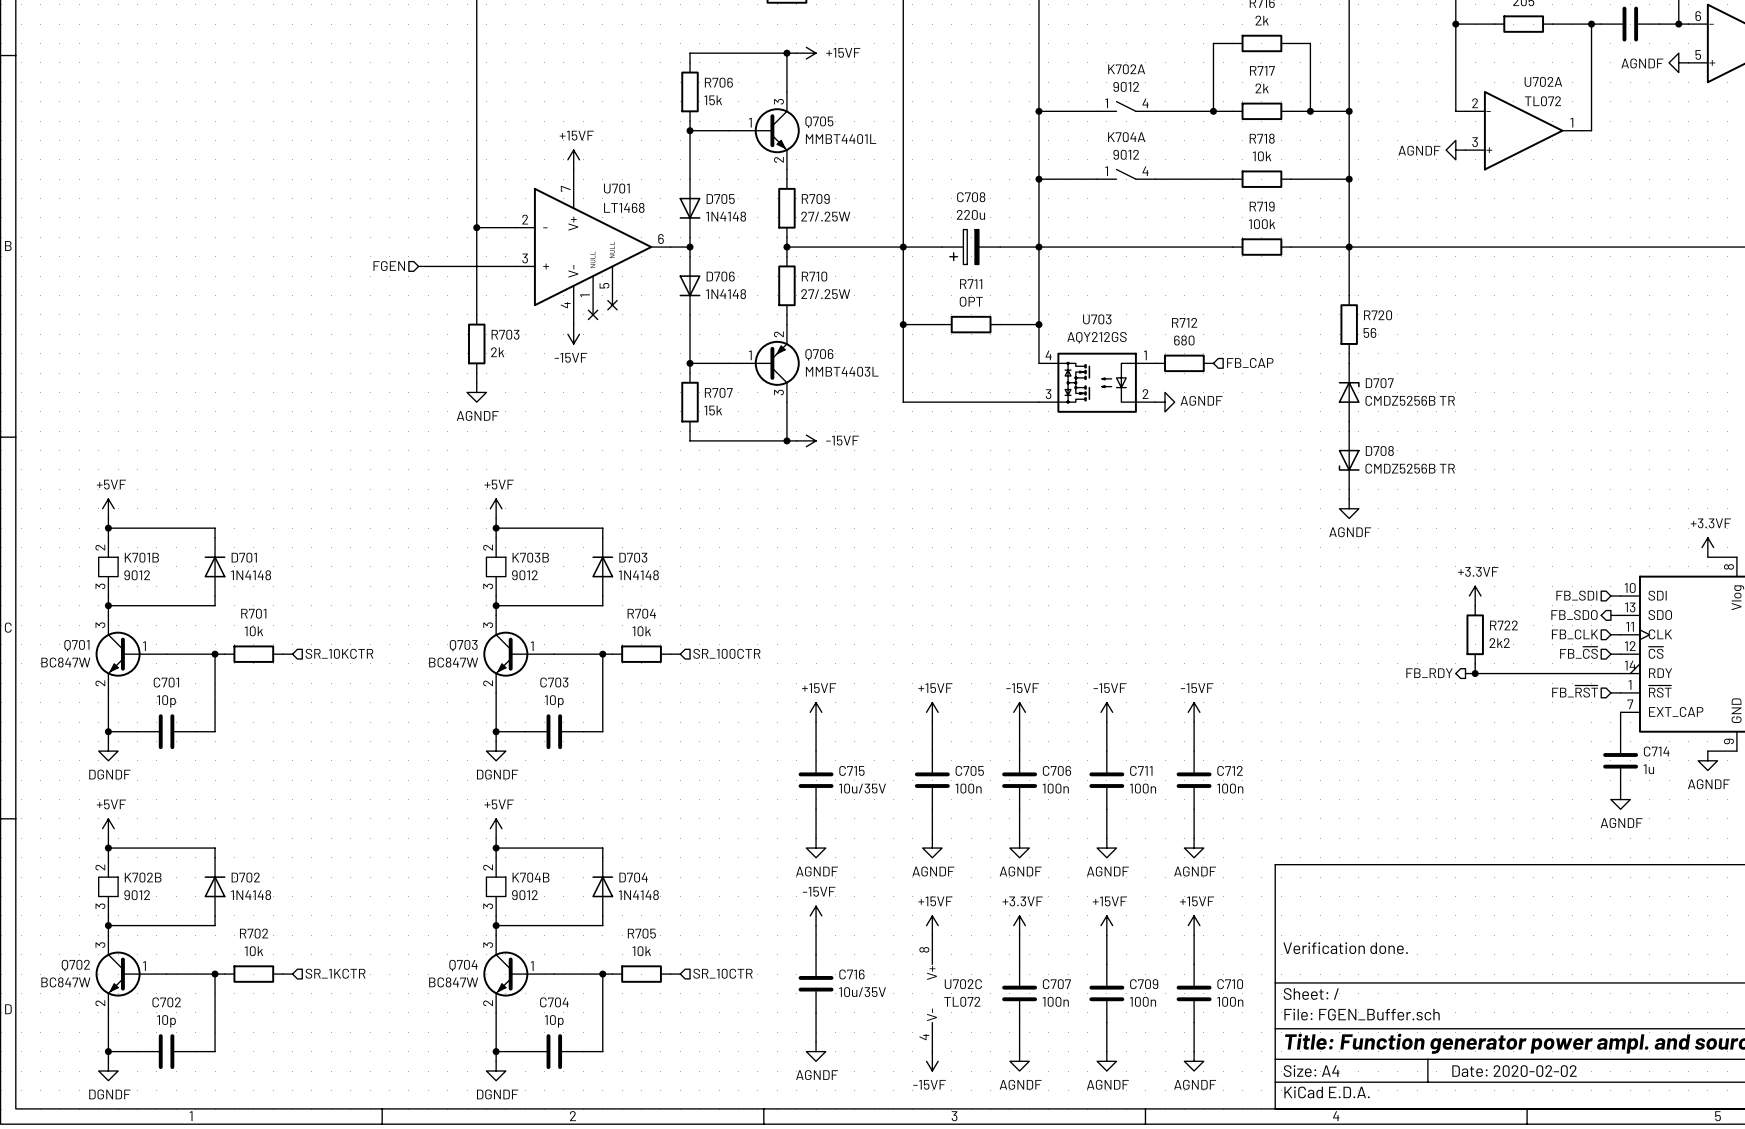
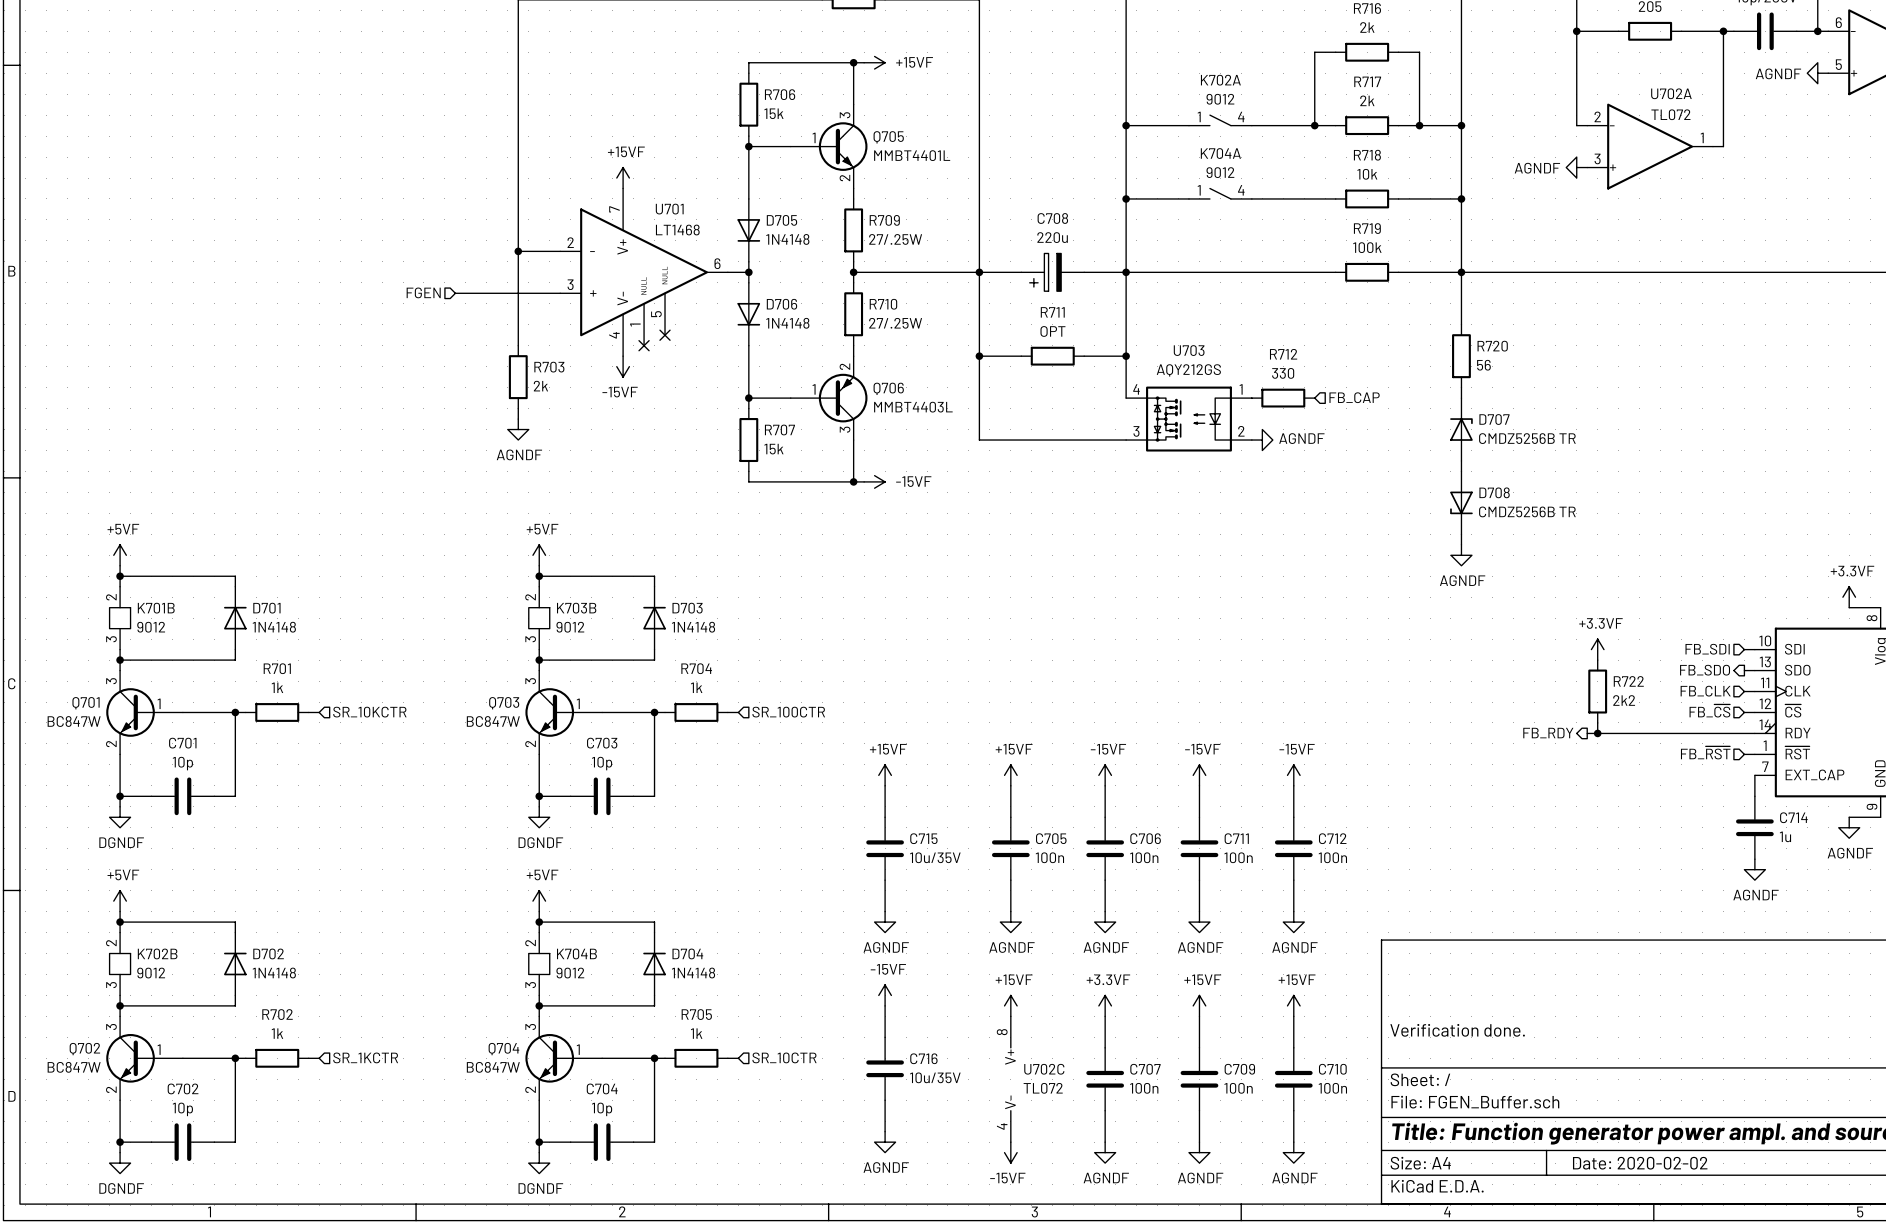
R712 value: 680 (1184, 340) -> 330 (1283, 373)
R701 value: 10k (253, 631) -> 1k (277, 687)
R704 value: 10k (641, 631) -> 1k (696, 687)
R702 value: 10k (253, 951) -> 1k (277, 1033)
R705 value: 10k (641, 951) -> 1k (696, 1033)

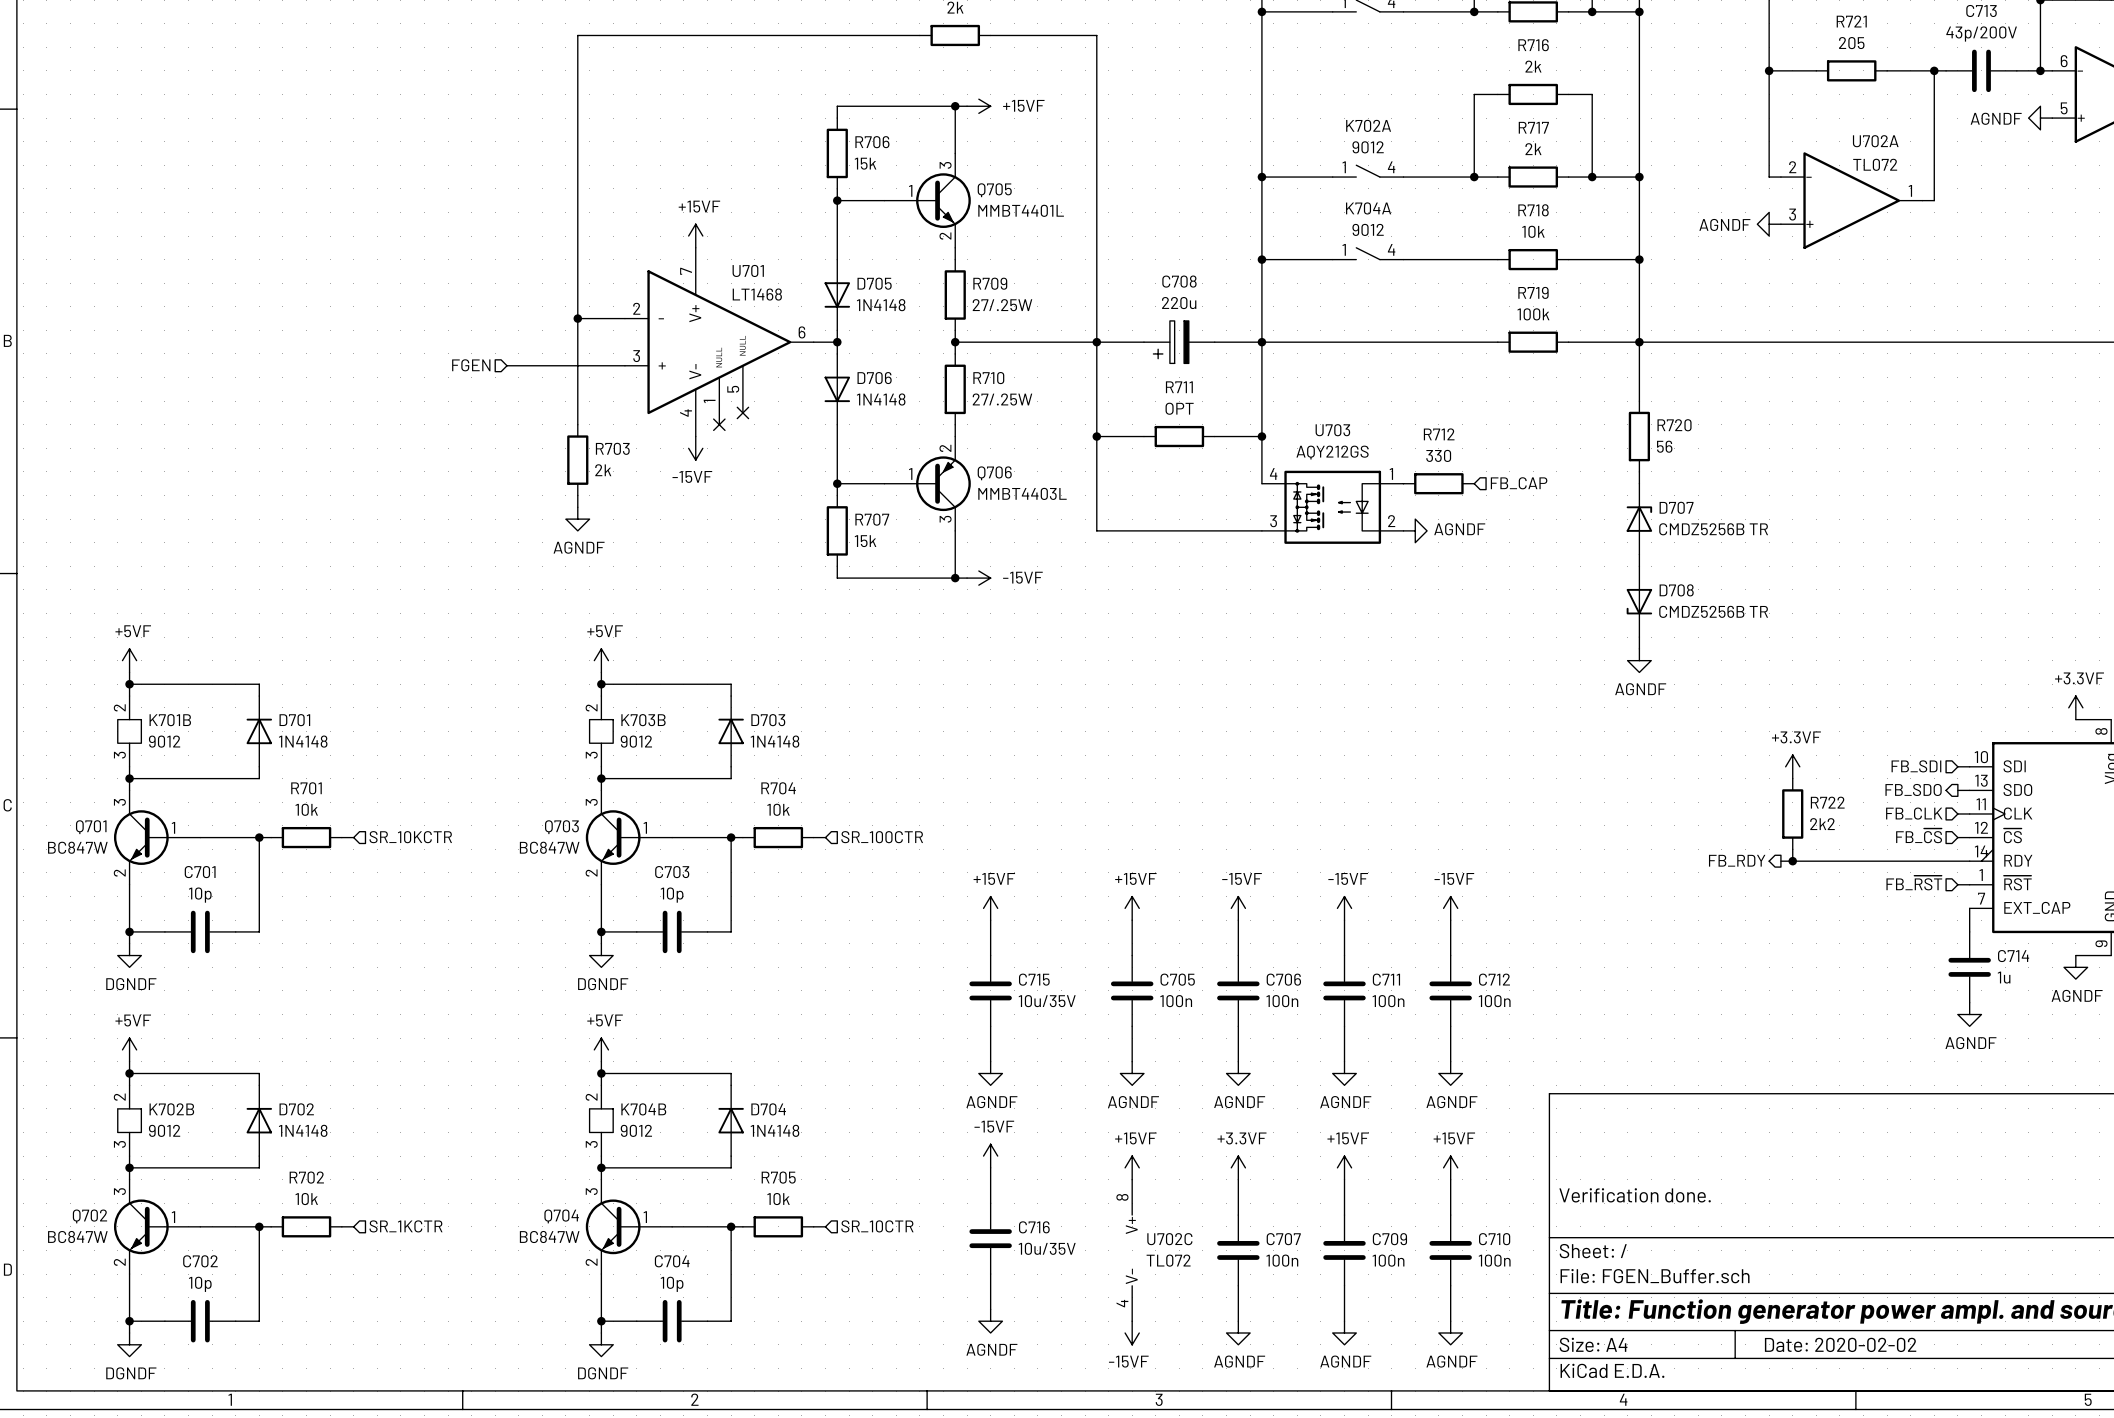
R701 value: 1k (277, 687) -> 10k (306, 809)
R704 value: 1k (696, 687) -> 10k (778, 809)
R702 value: 1k (277, 1033) -> 10k (306, 1199)
R705 value: 1k (696, 1033) -> 10k (778, 1199)

